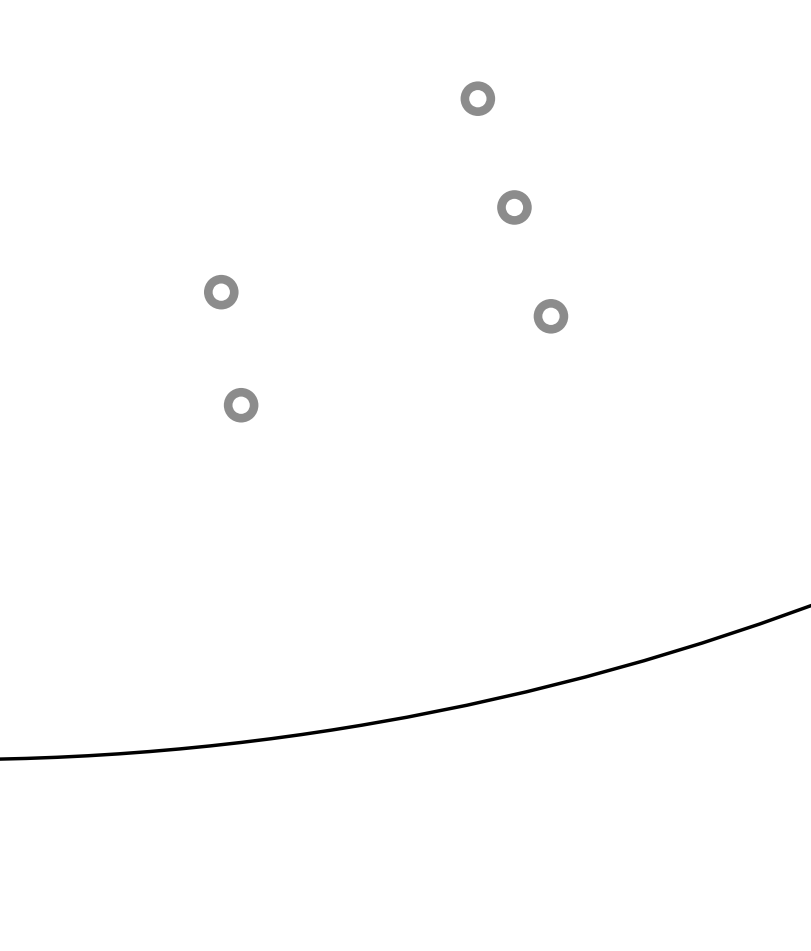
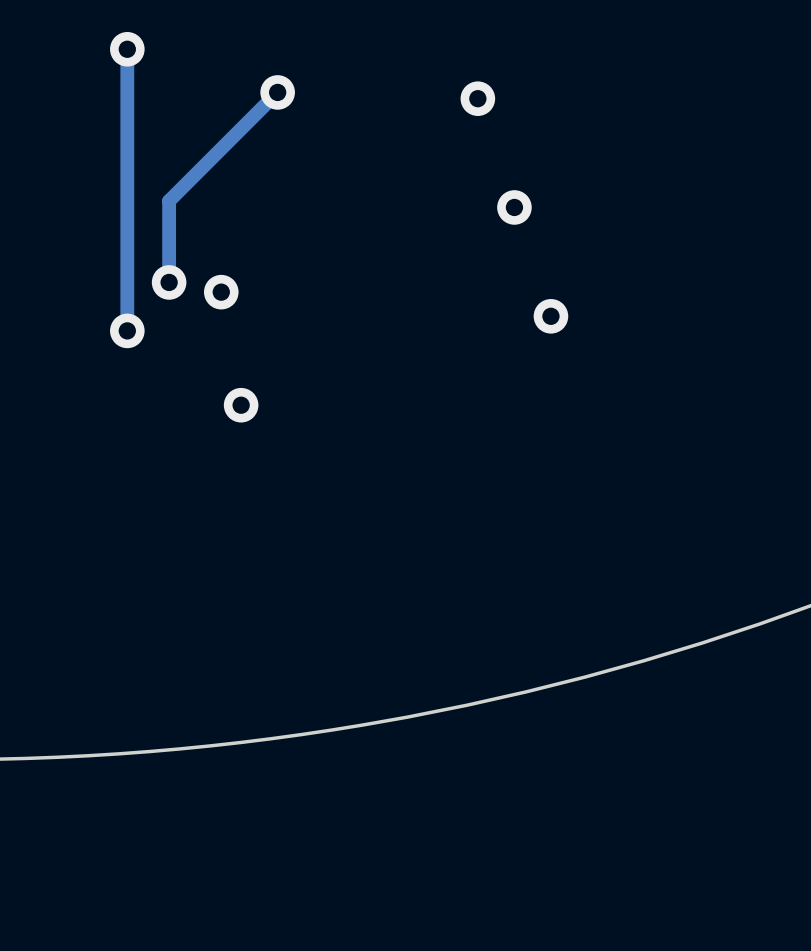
track: none -> (127, 49) (127, 330)
via: none -> (127, 49)
track: none -> (277, 92) (169, 200) (169, 282)
via: none -> (277, 92)
via: none -> (169, 282)
via: none -> (127, 330)

